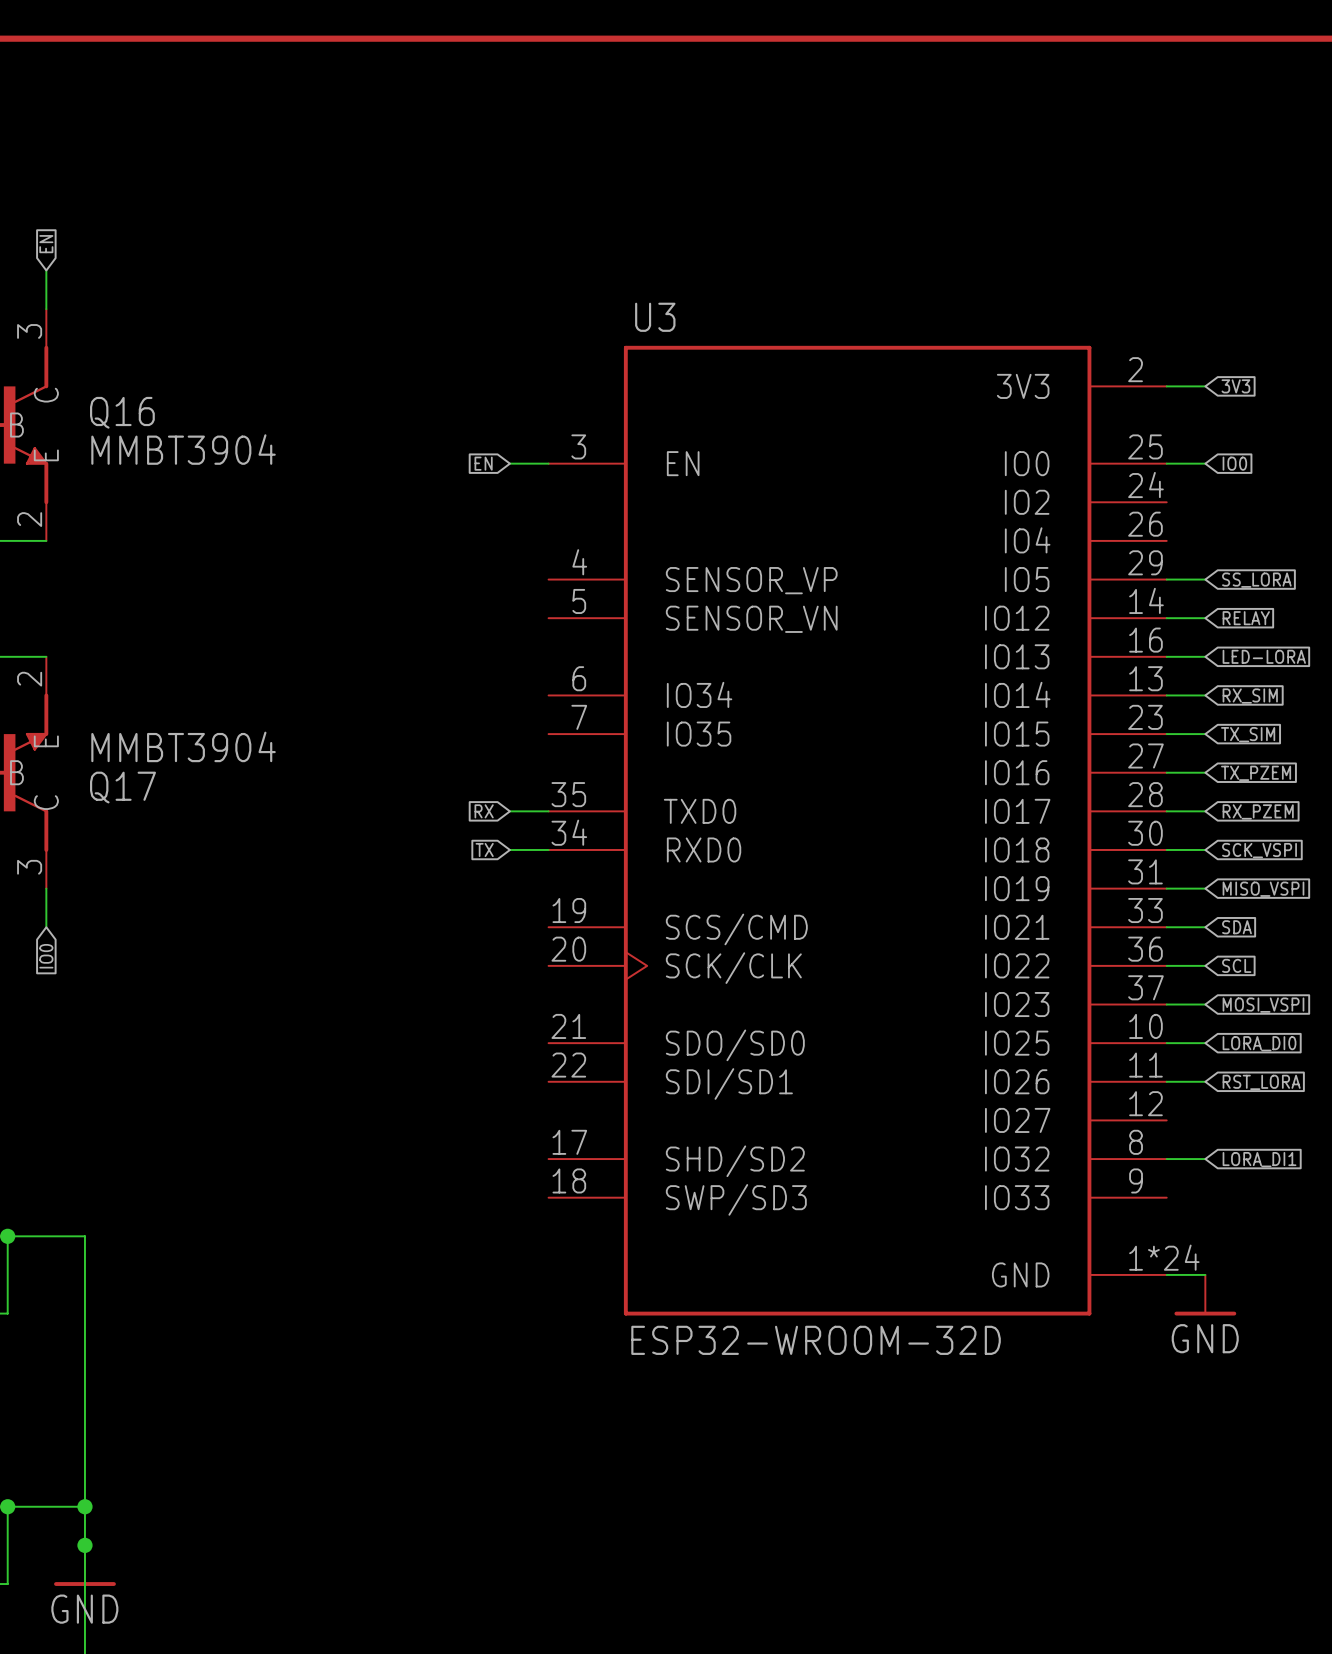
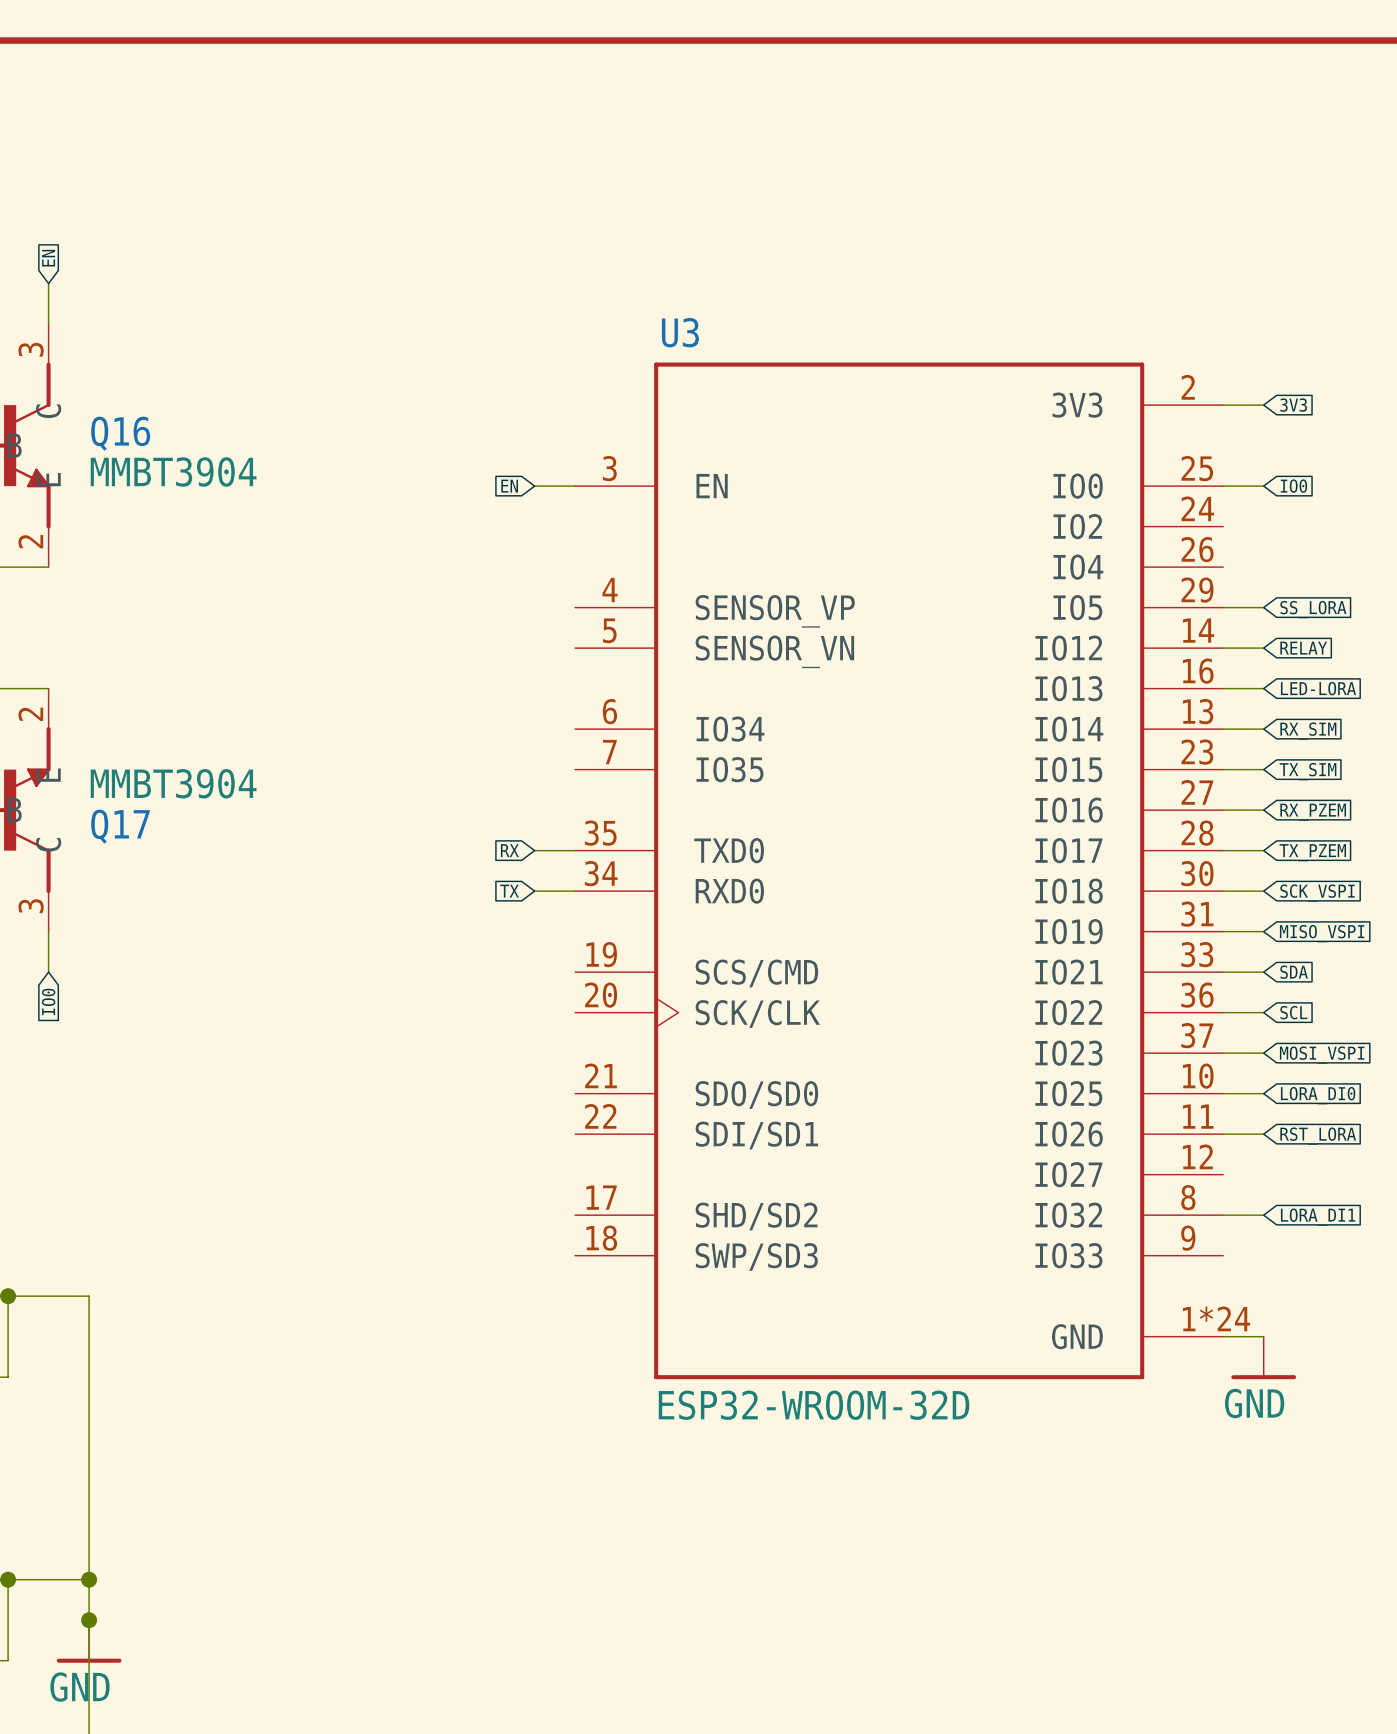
global label: TX_PZEM (1256, 773) -> RX_PZEM (1313, 812)
global label: RX_PZEM (1258, 811) -> TX_PZEM (1312, 852)

